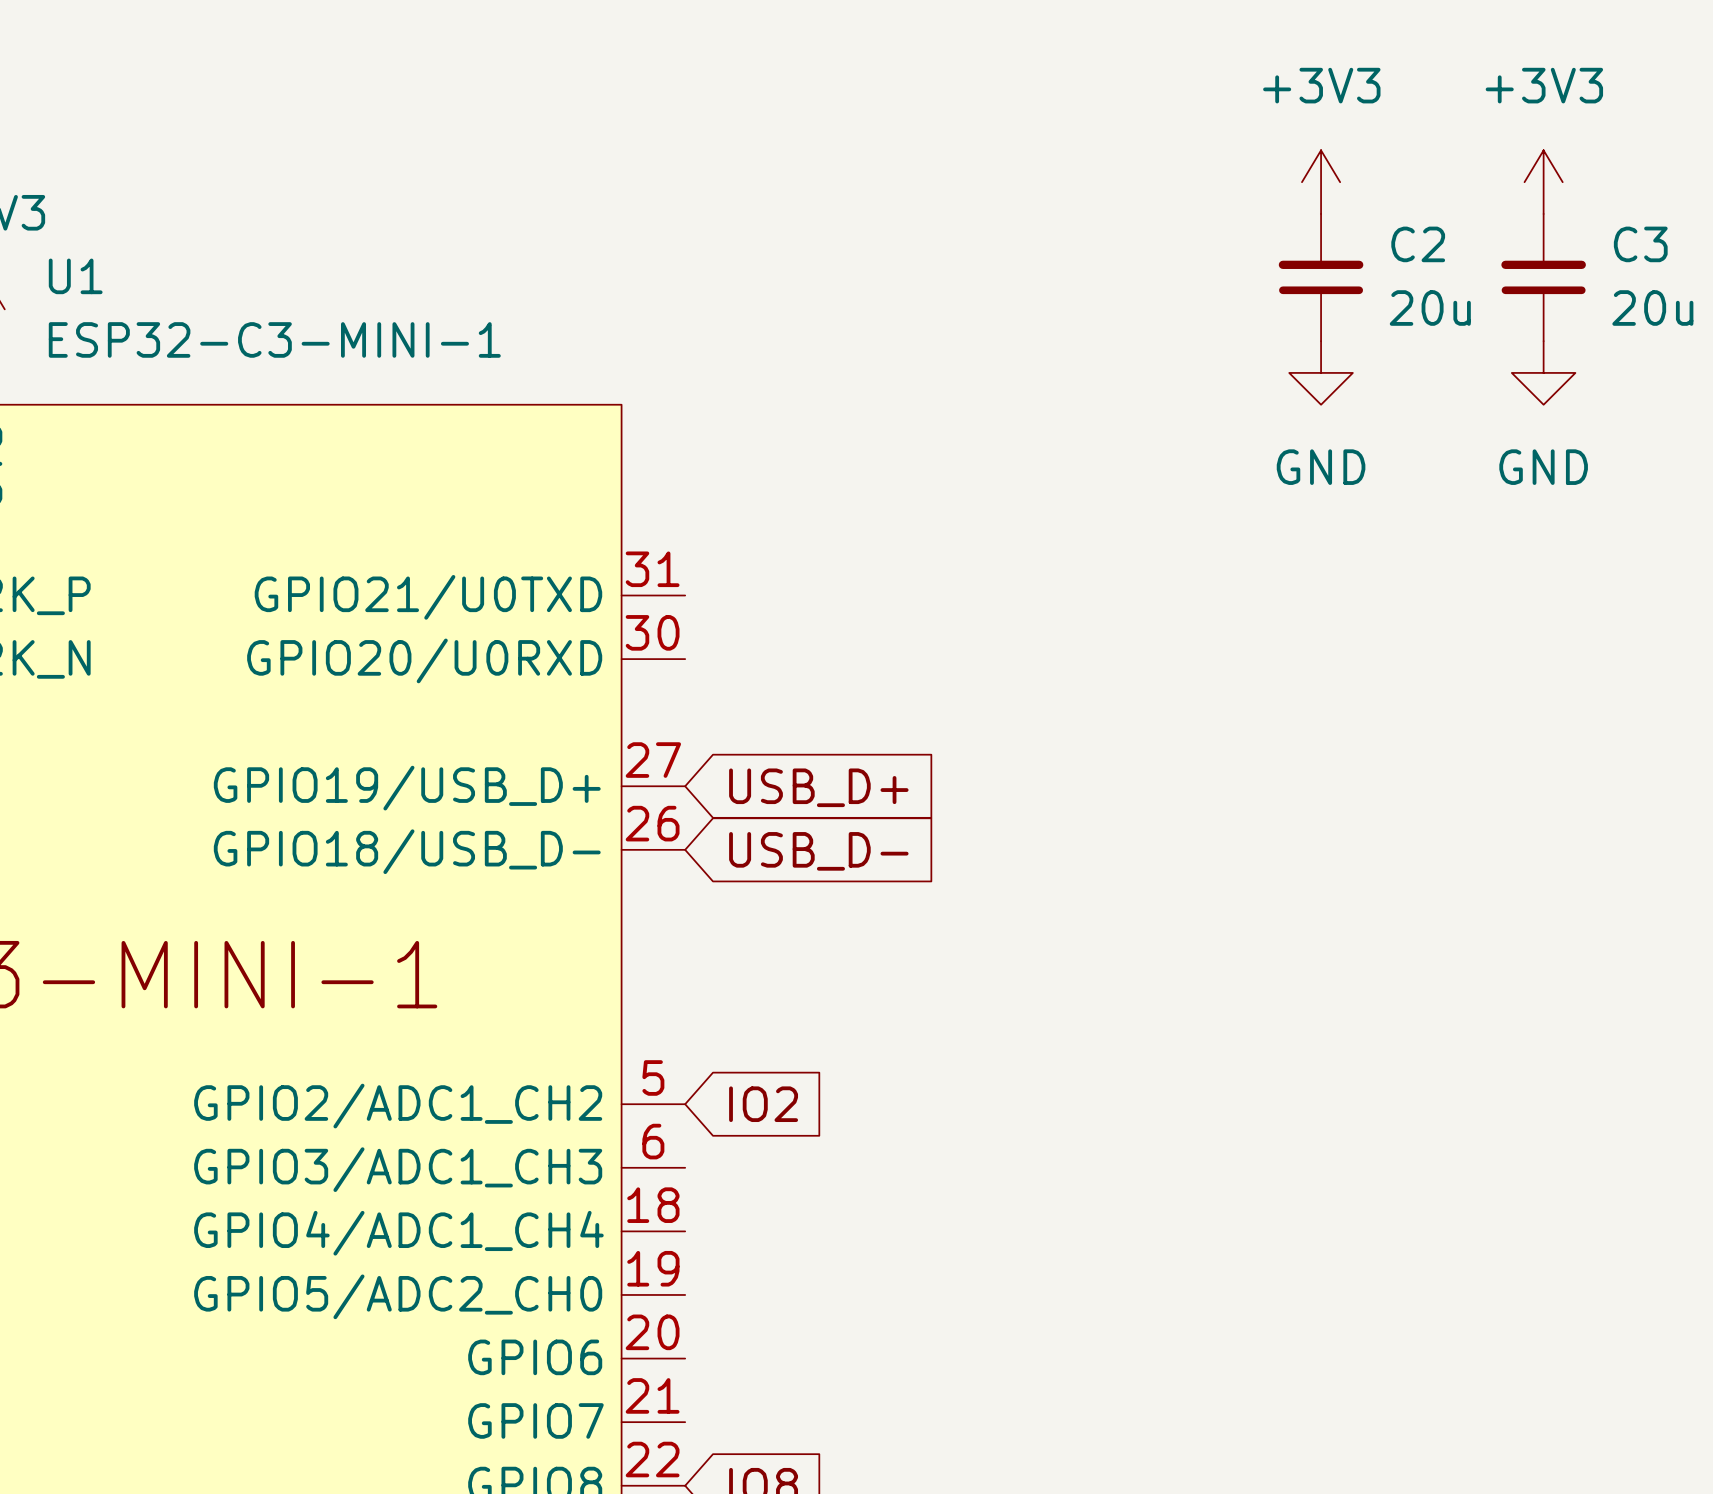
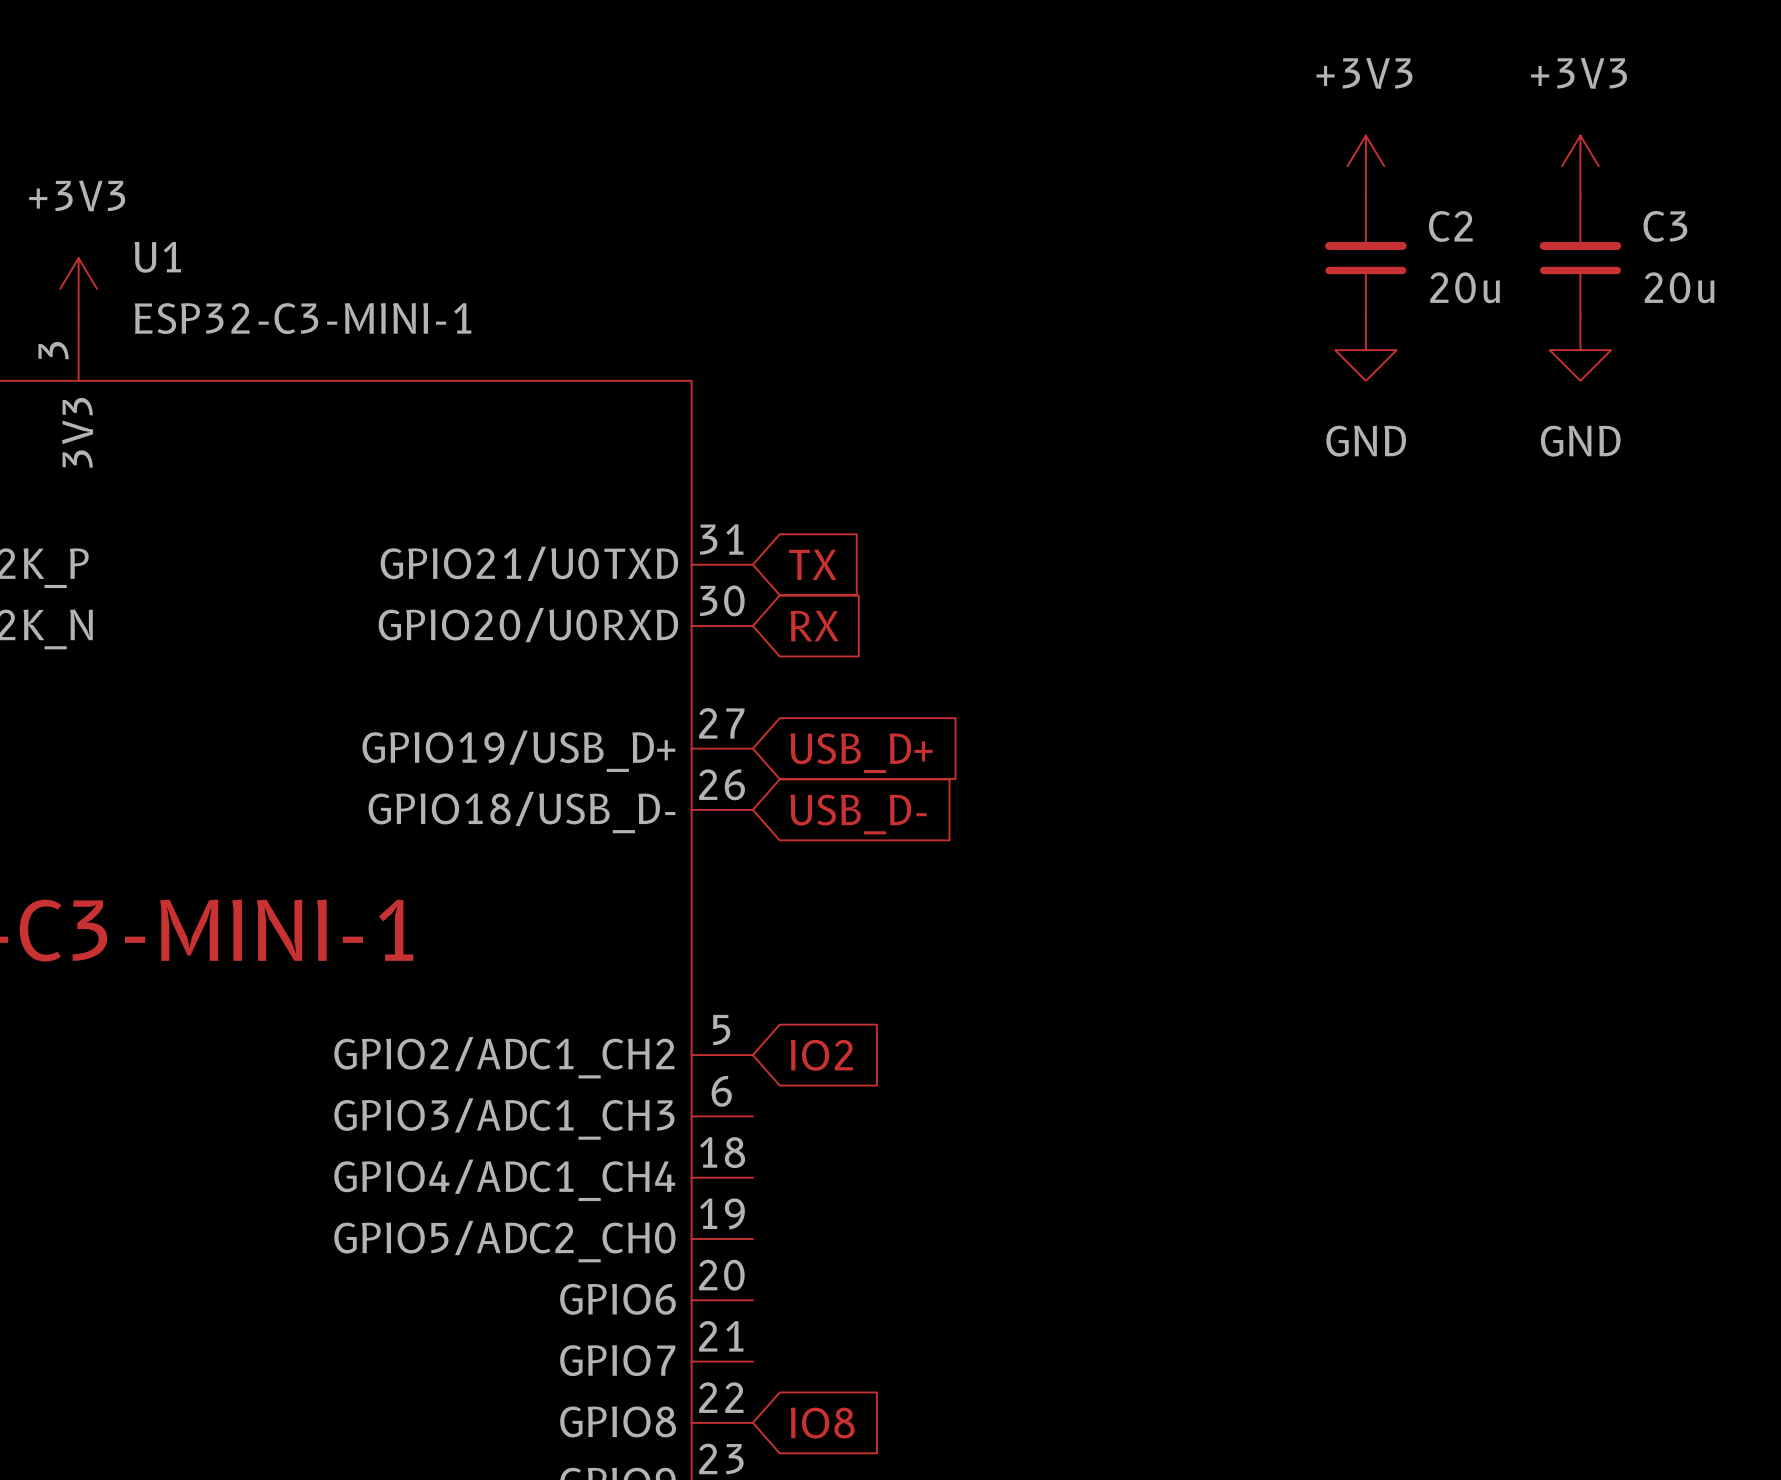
global label: none -> TX (812, 564)
global label: none -> RX (814, 626)

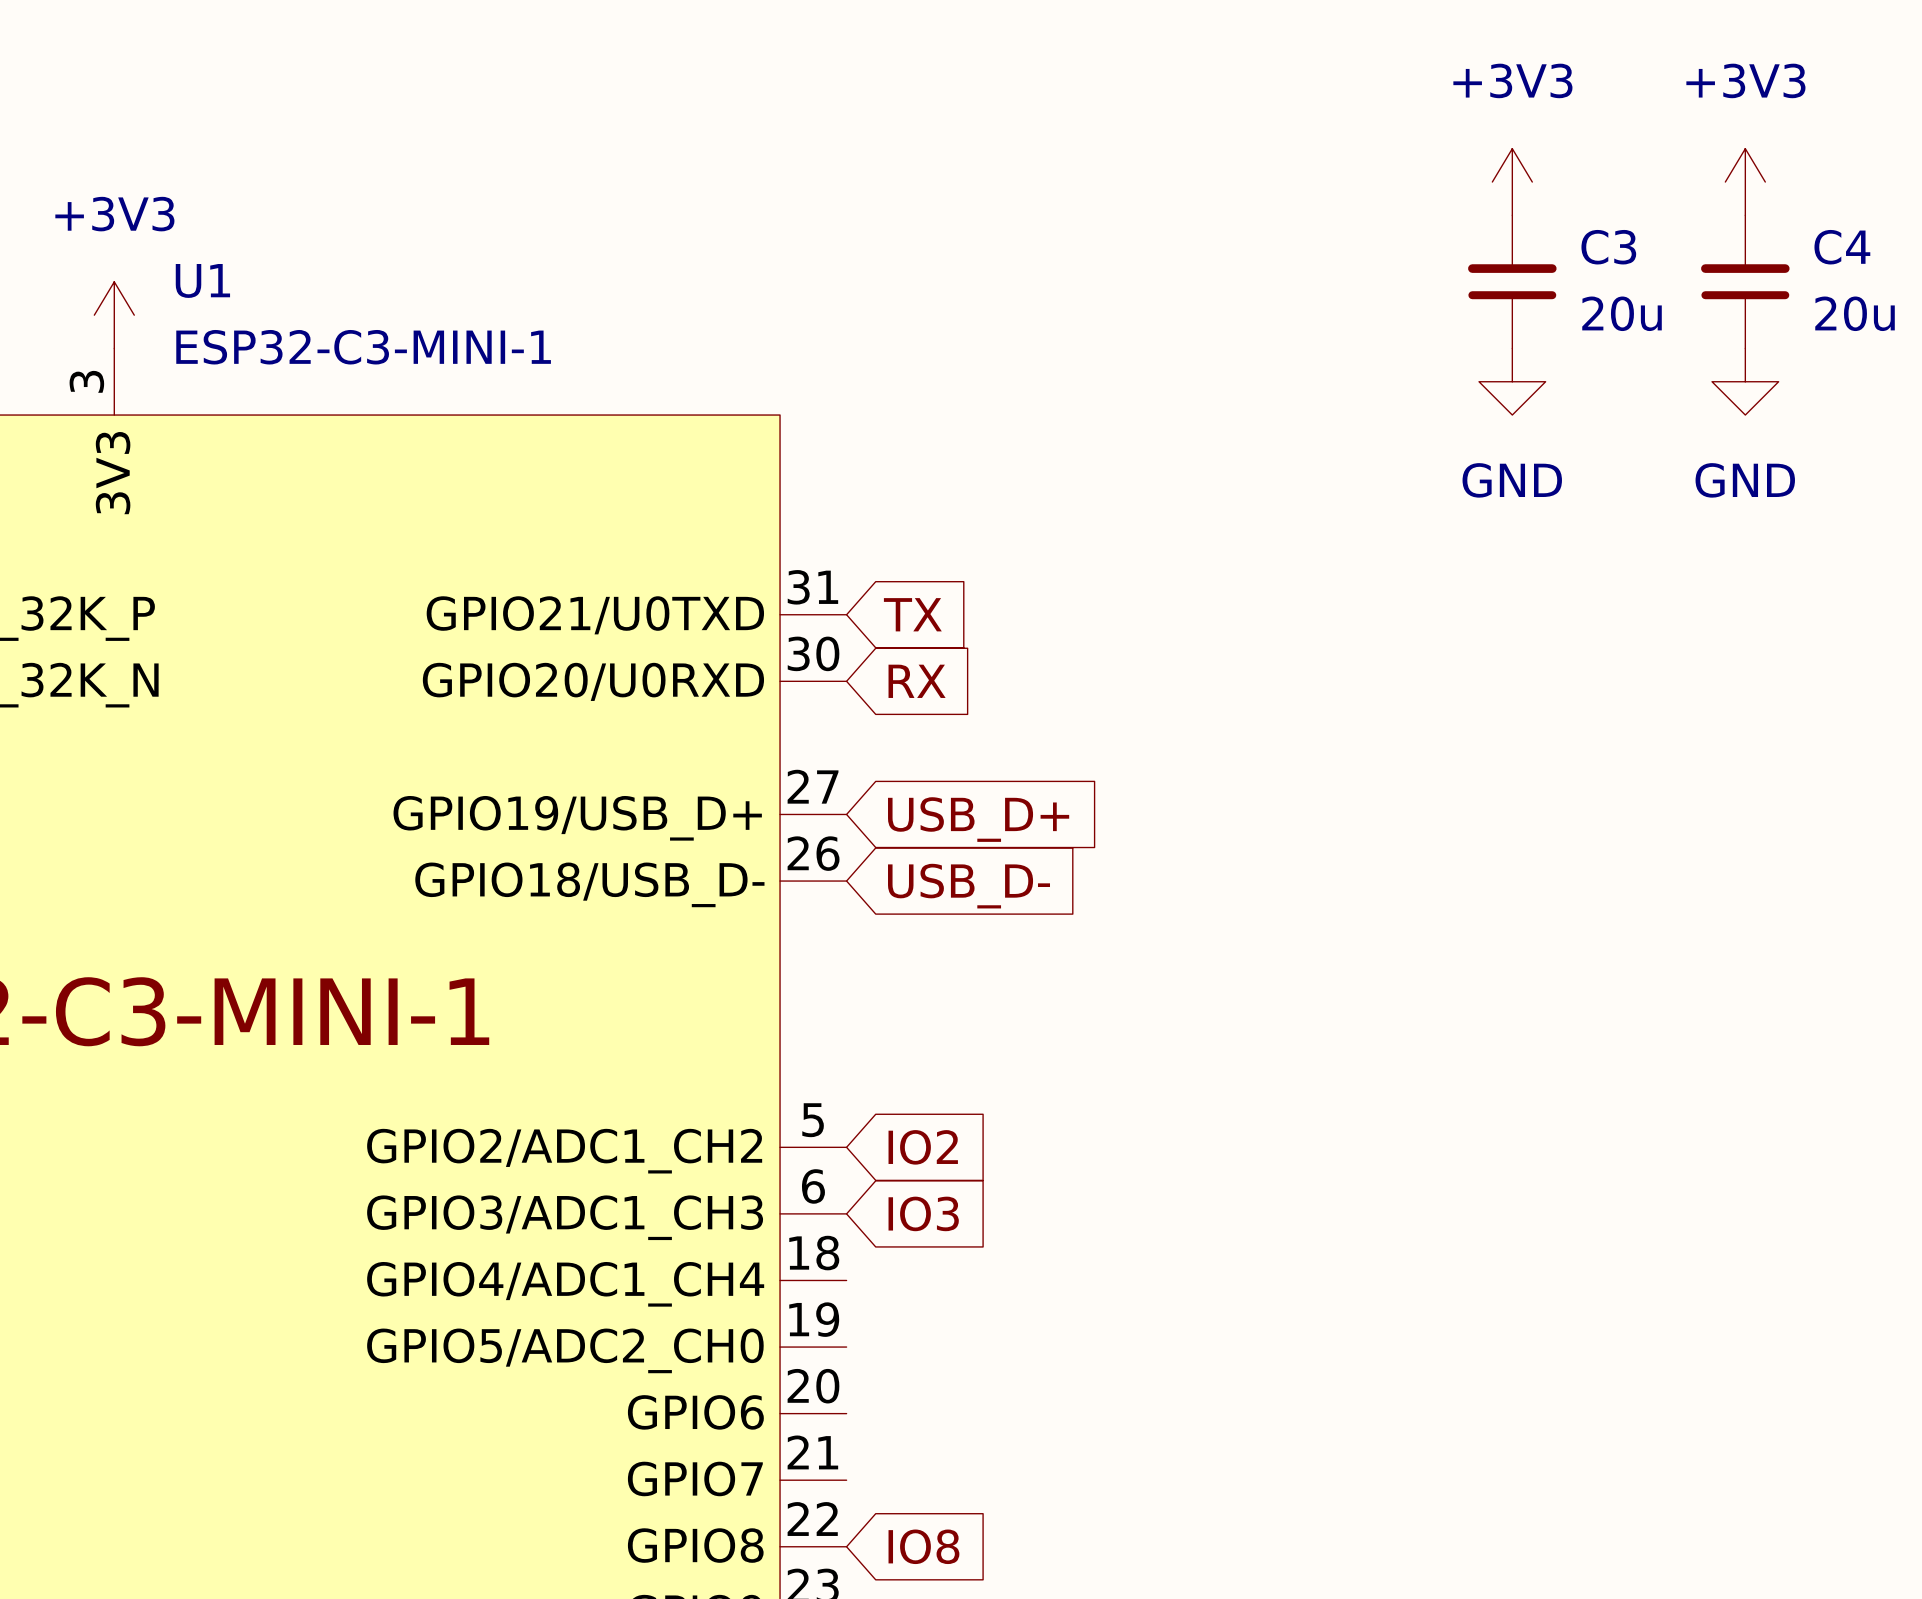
C2 name: C2 (1450, 226) -> C3 (1608, 247)
C3 name: C3 (1665, 226) -> C4 (1842, 247)
global label: none -> IO3 (923, 1213)

